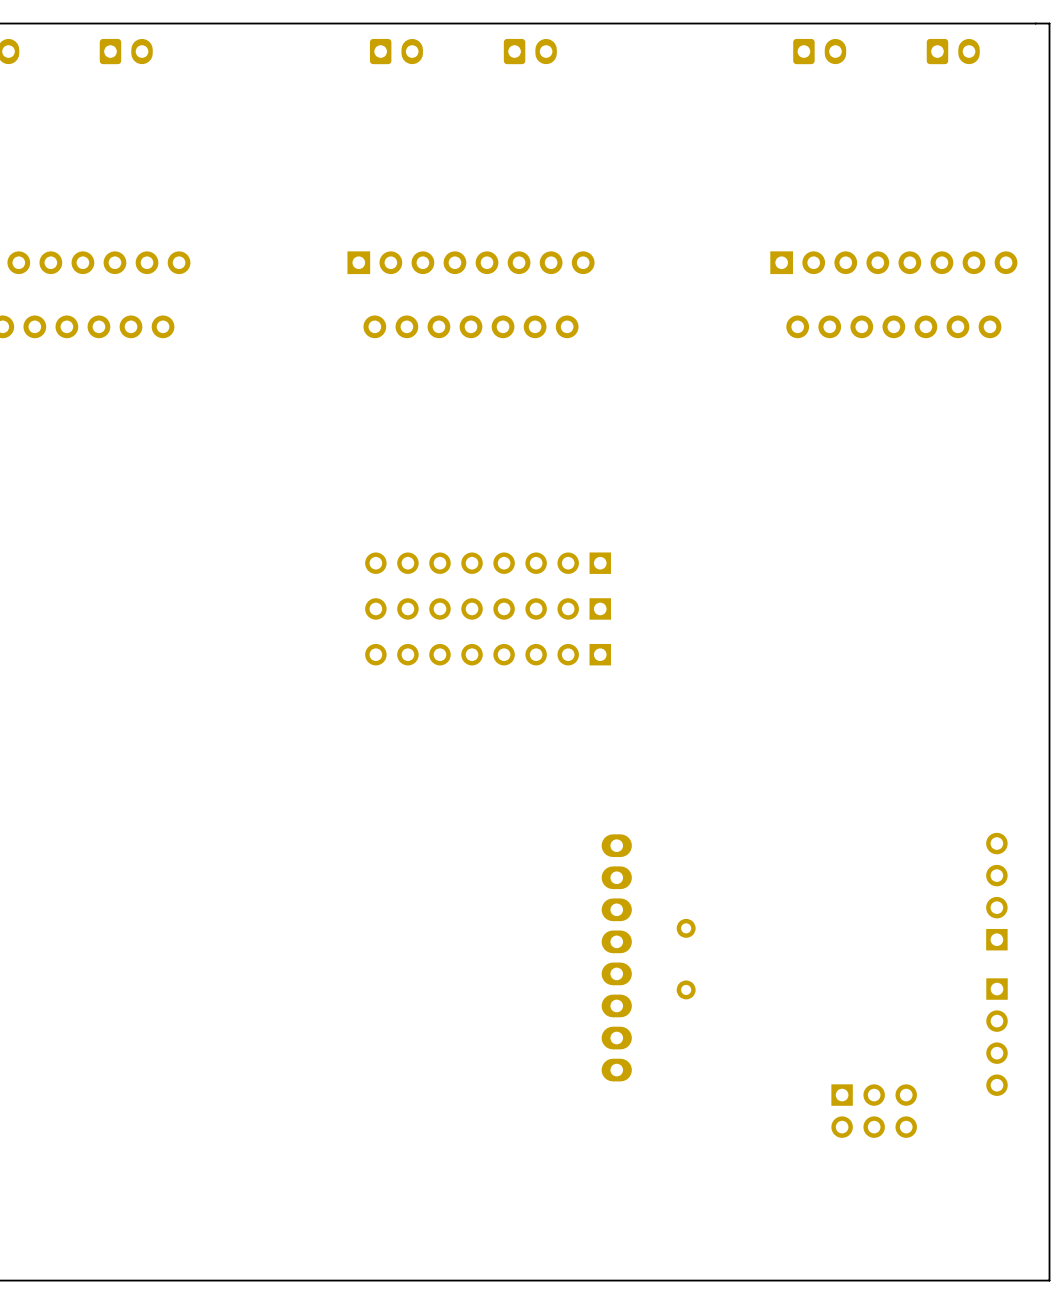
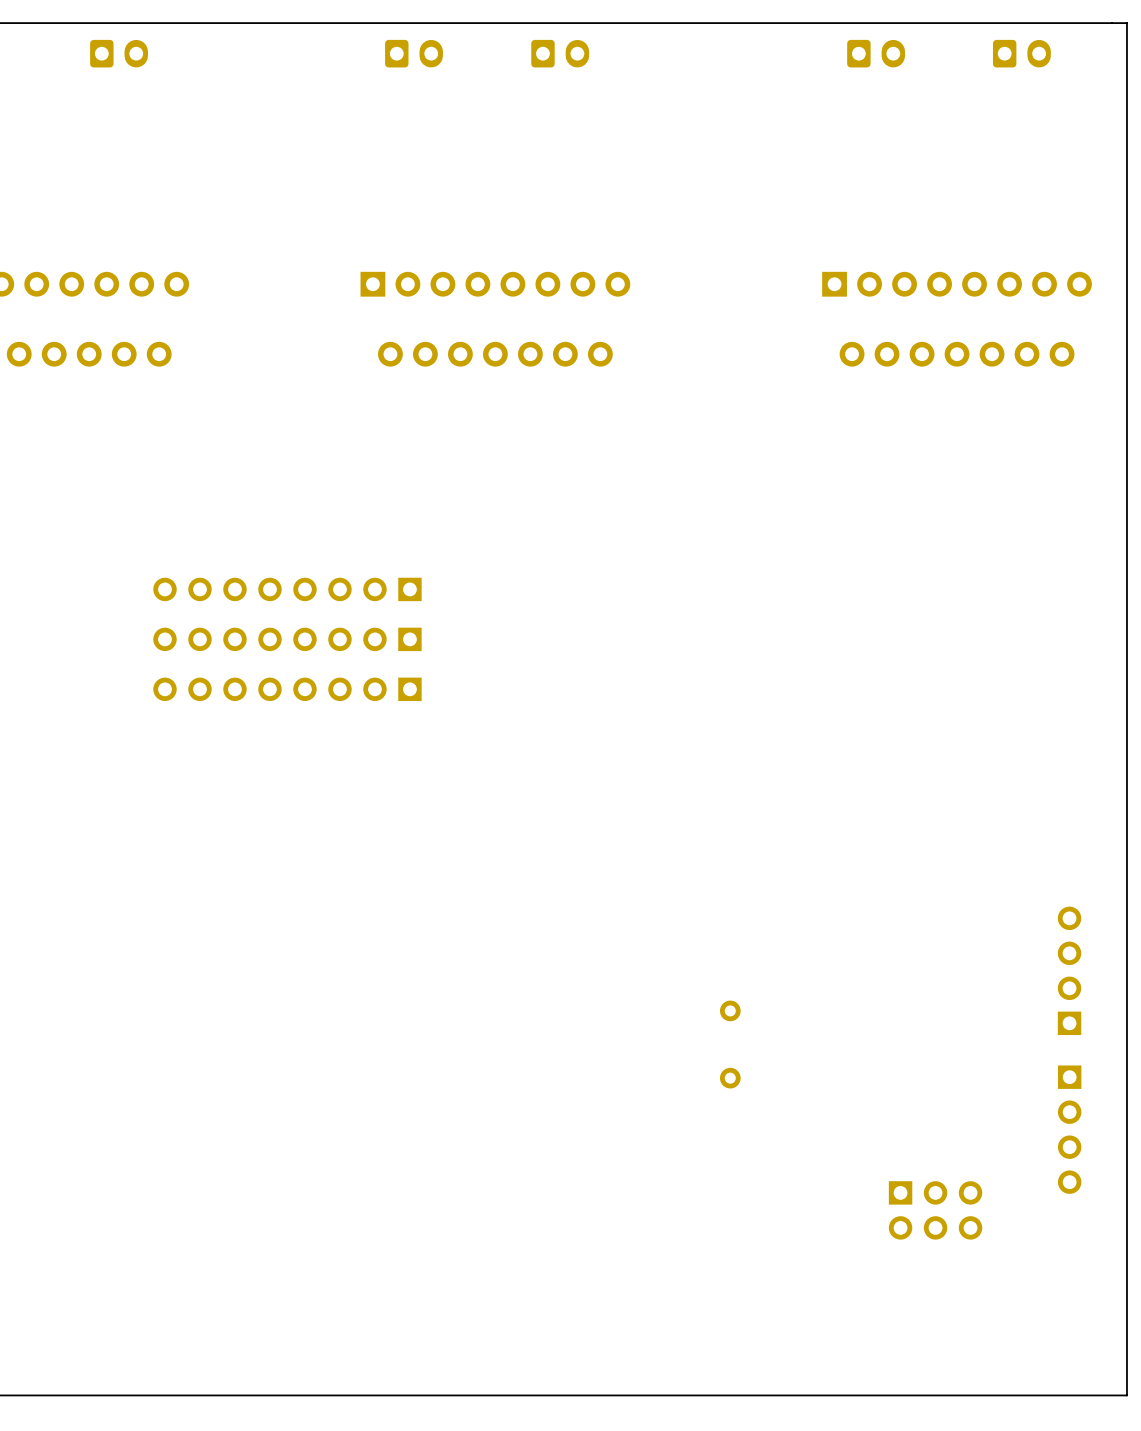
part: none -> (287, 589)
part: (488, 563) -> none
part: none -> (287, 639)
part: (488, 608) -> none
part: none -> (287, 689)
part: (488, 654) -> none
part: (616, 957) -> none

